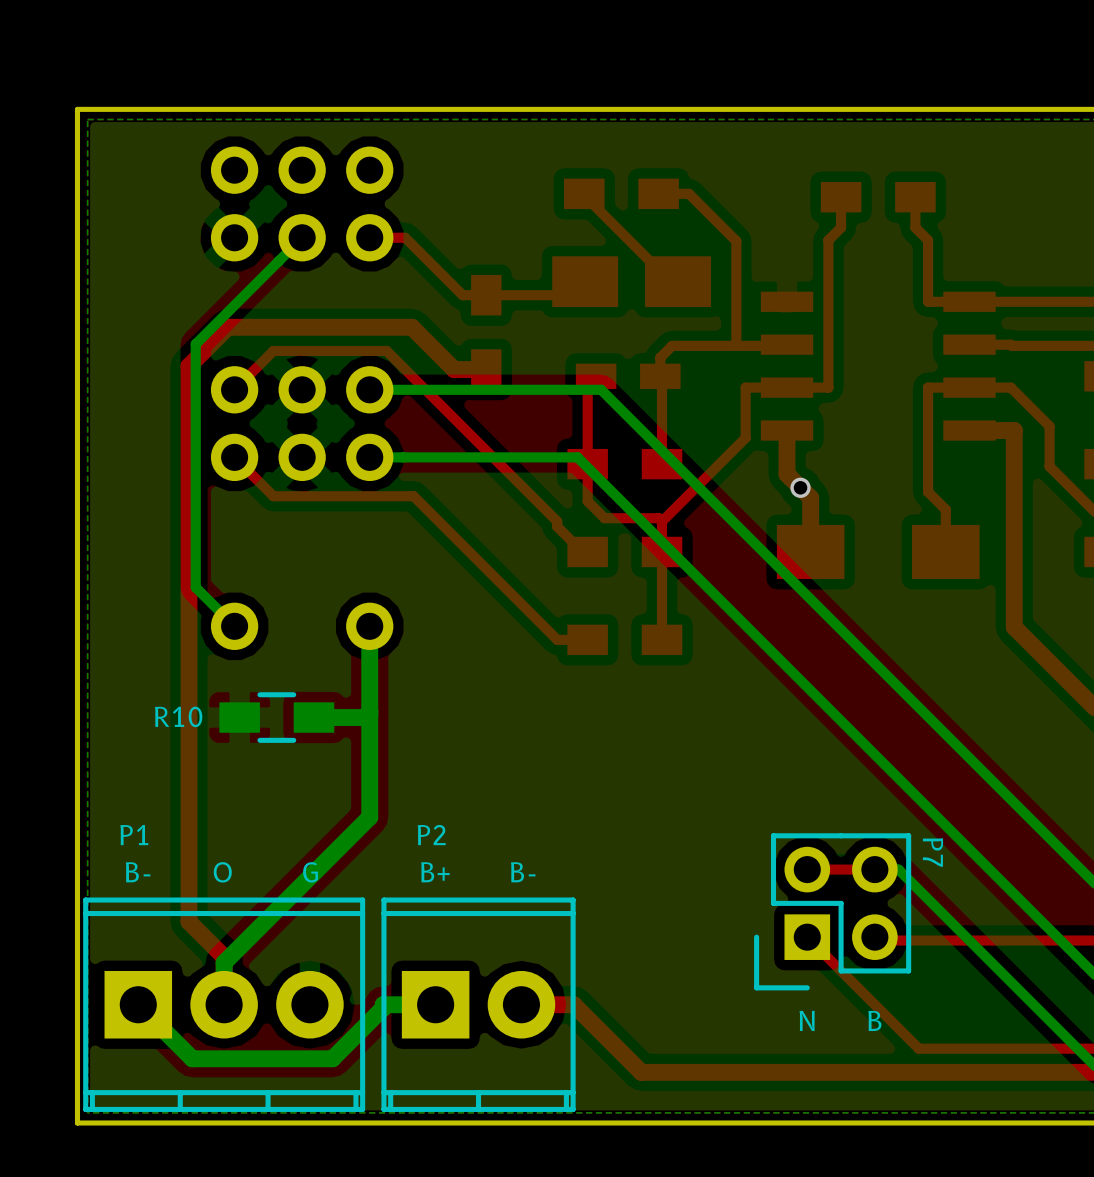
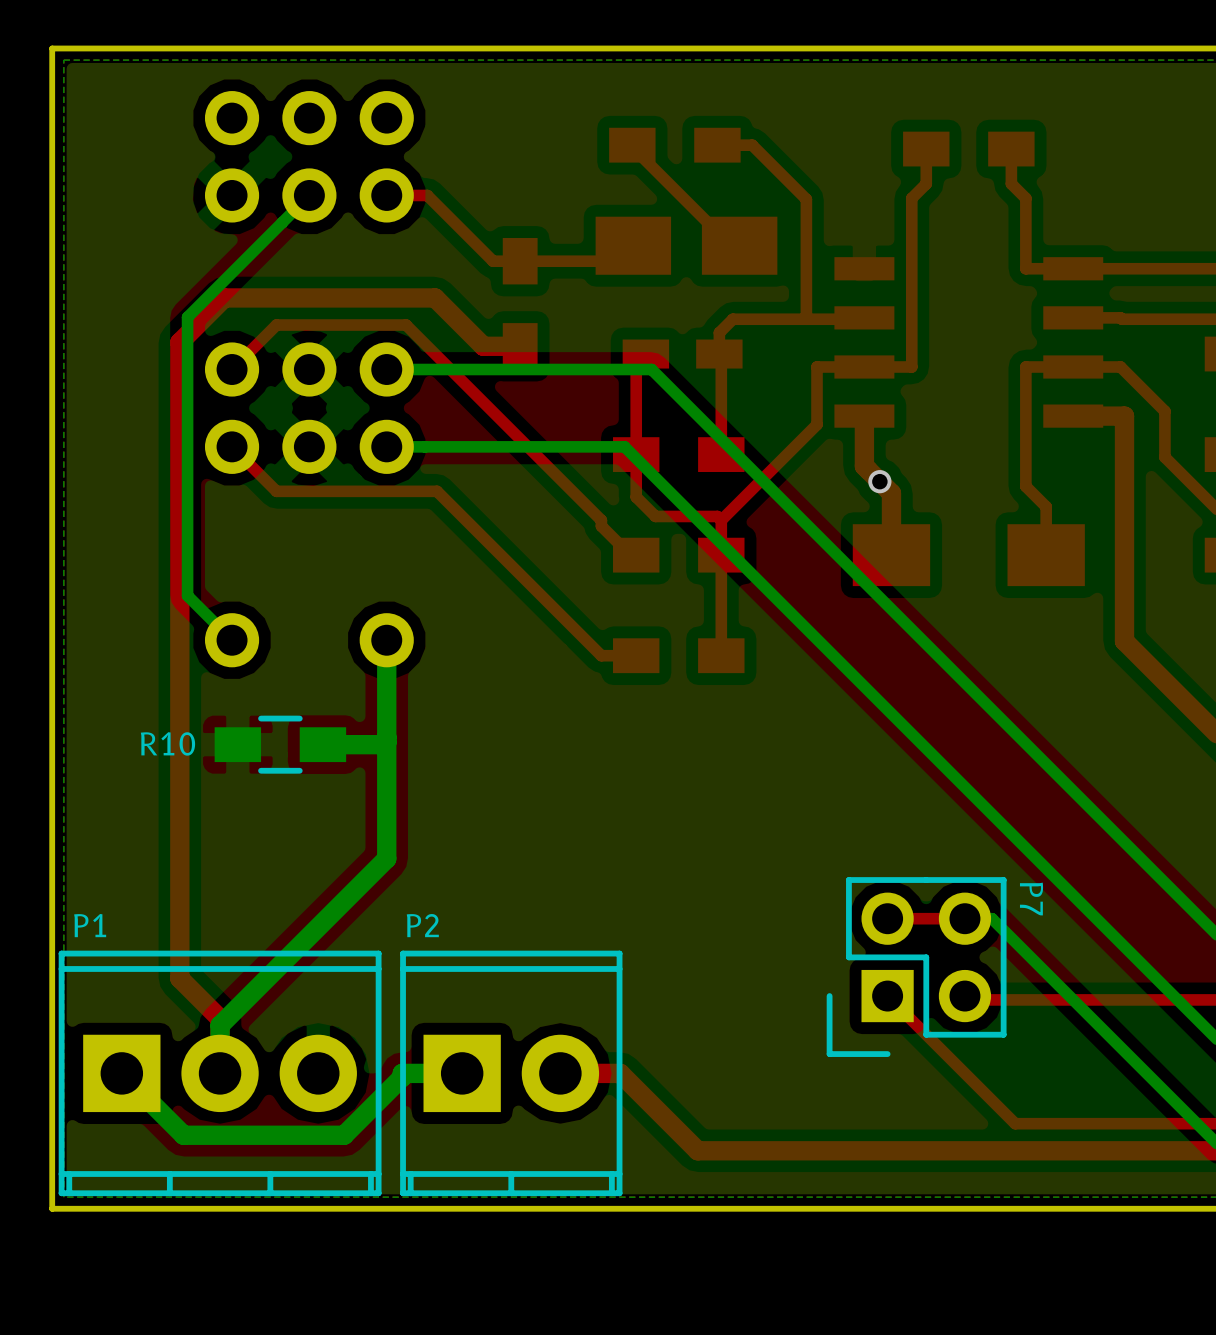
P1 name position: P1 (134, 835) -> P1 (90, 925)
P2 name position: P2 (431, 835) -> P2 (422, 925)
text: B- (138, 872) -> none
text: O (222, 872) -> none
text: G (310, 872) -> none
text: B+ (435, 872) -> none
text: B- (523, 872) -> none
text: N (807, 1020) -> none
text: B (874, 1020) -> none

